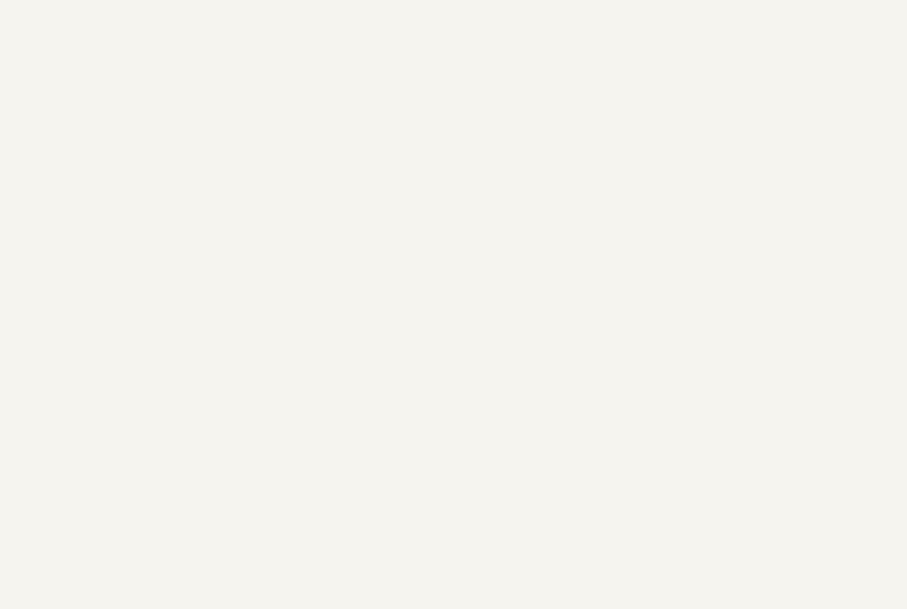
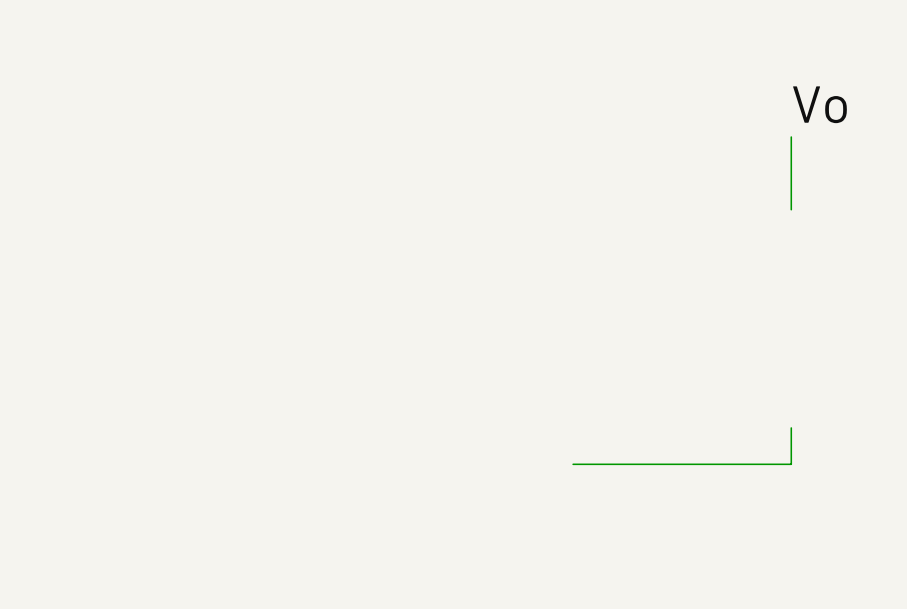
label: none -> Vo (819, 104)
wire: none -> (791, 137) (791, 209)
wire: none -> (791, 427) (791, 464) (573, 464)

